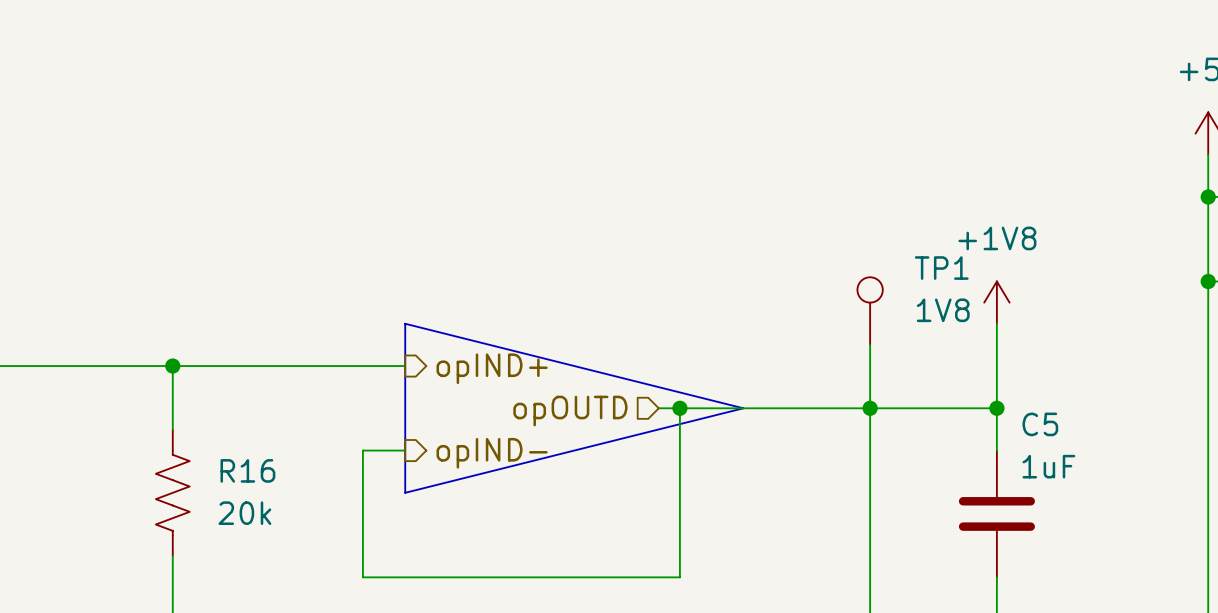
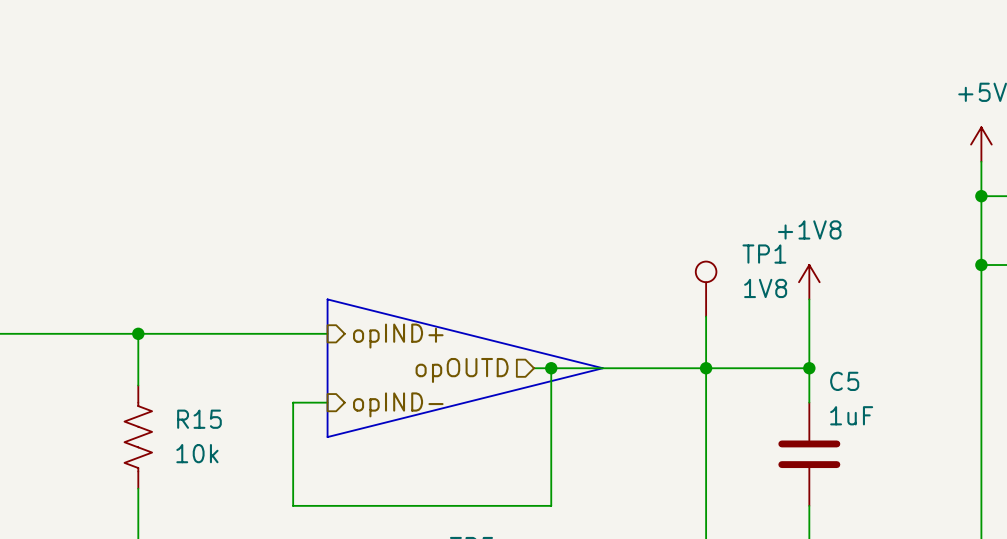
R16 name: R16 (247, 470) -> R15 (199, 419)
R16 value: 20k (244, 513) -> 10k (197, 453)

